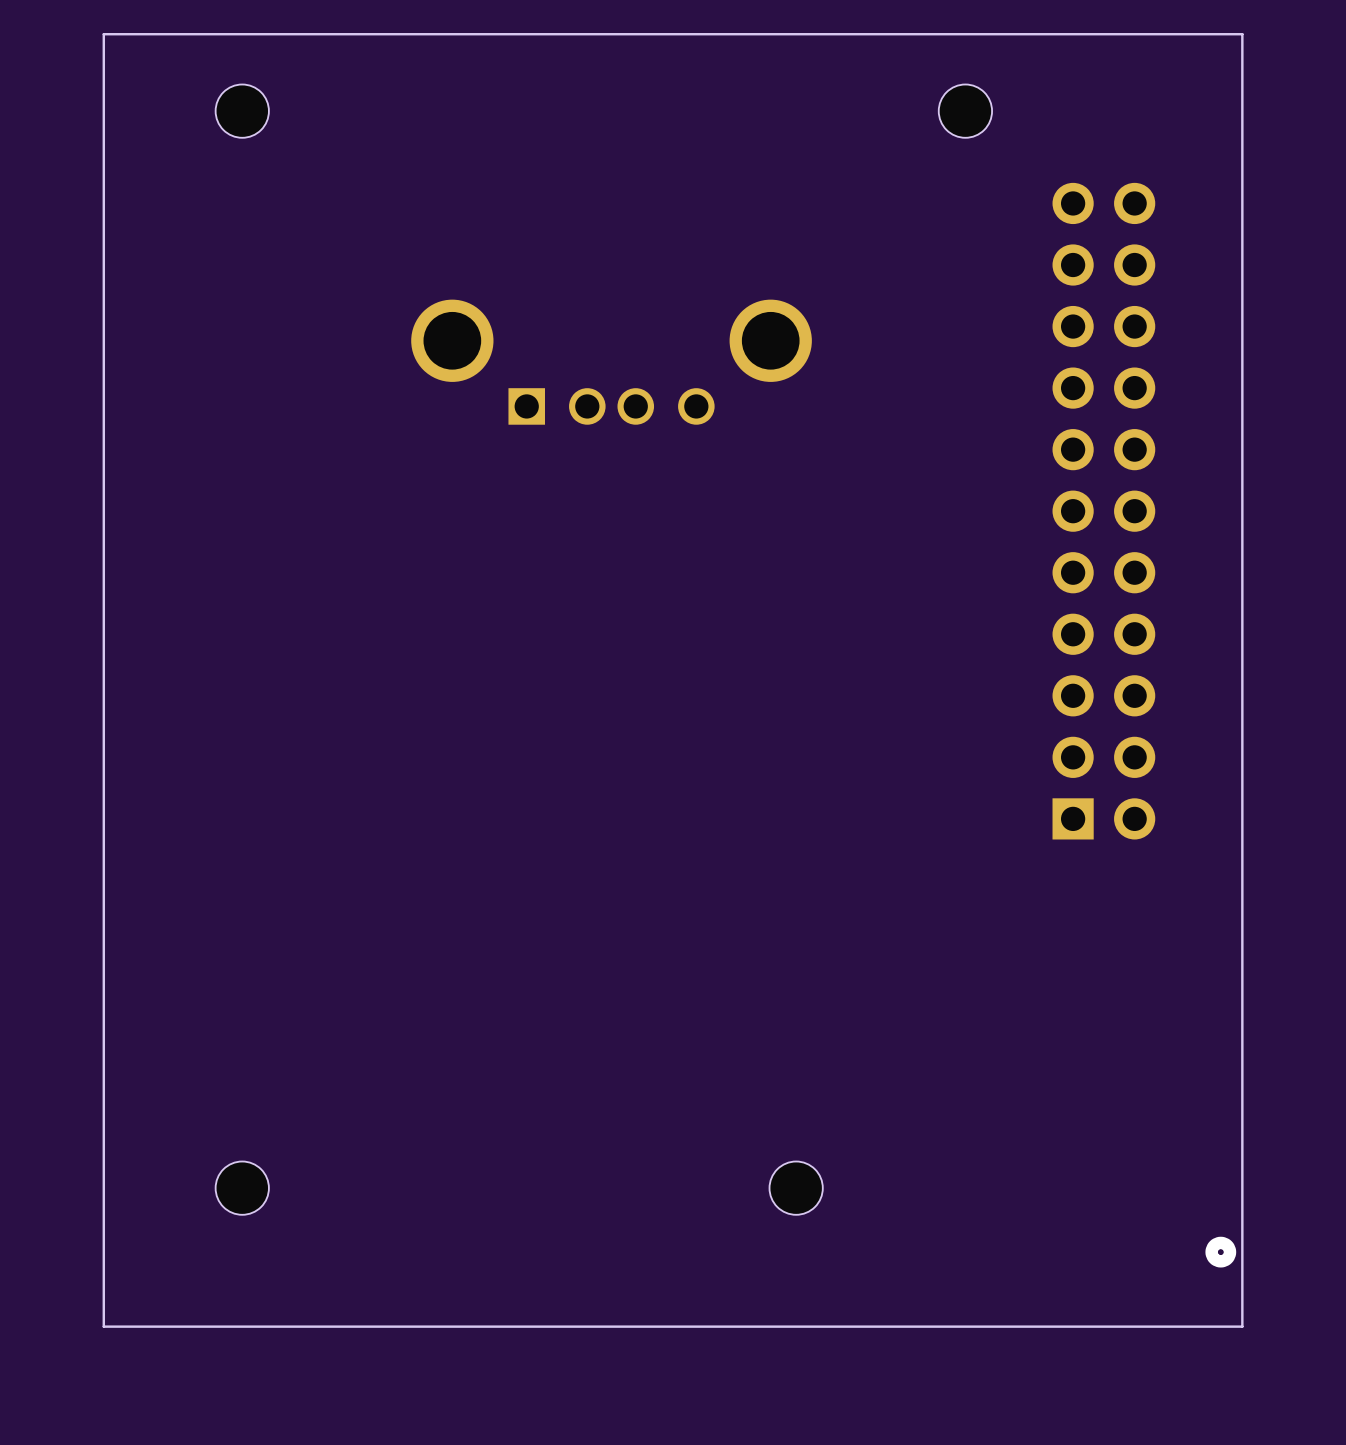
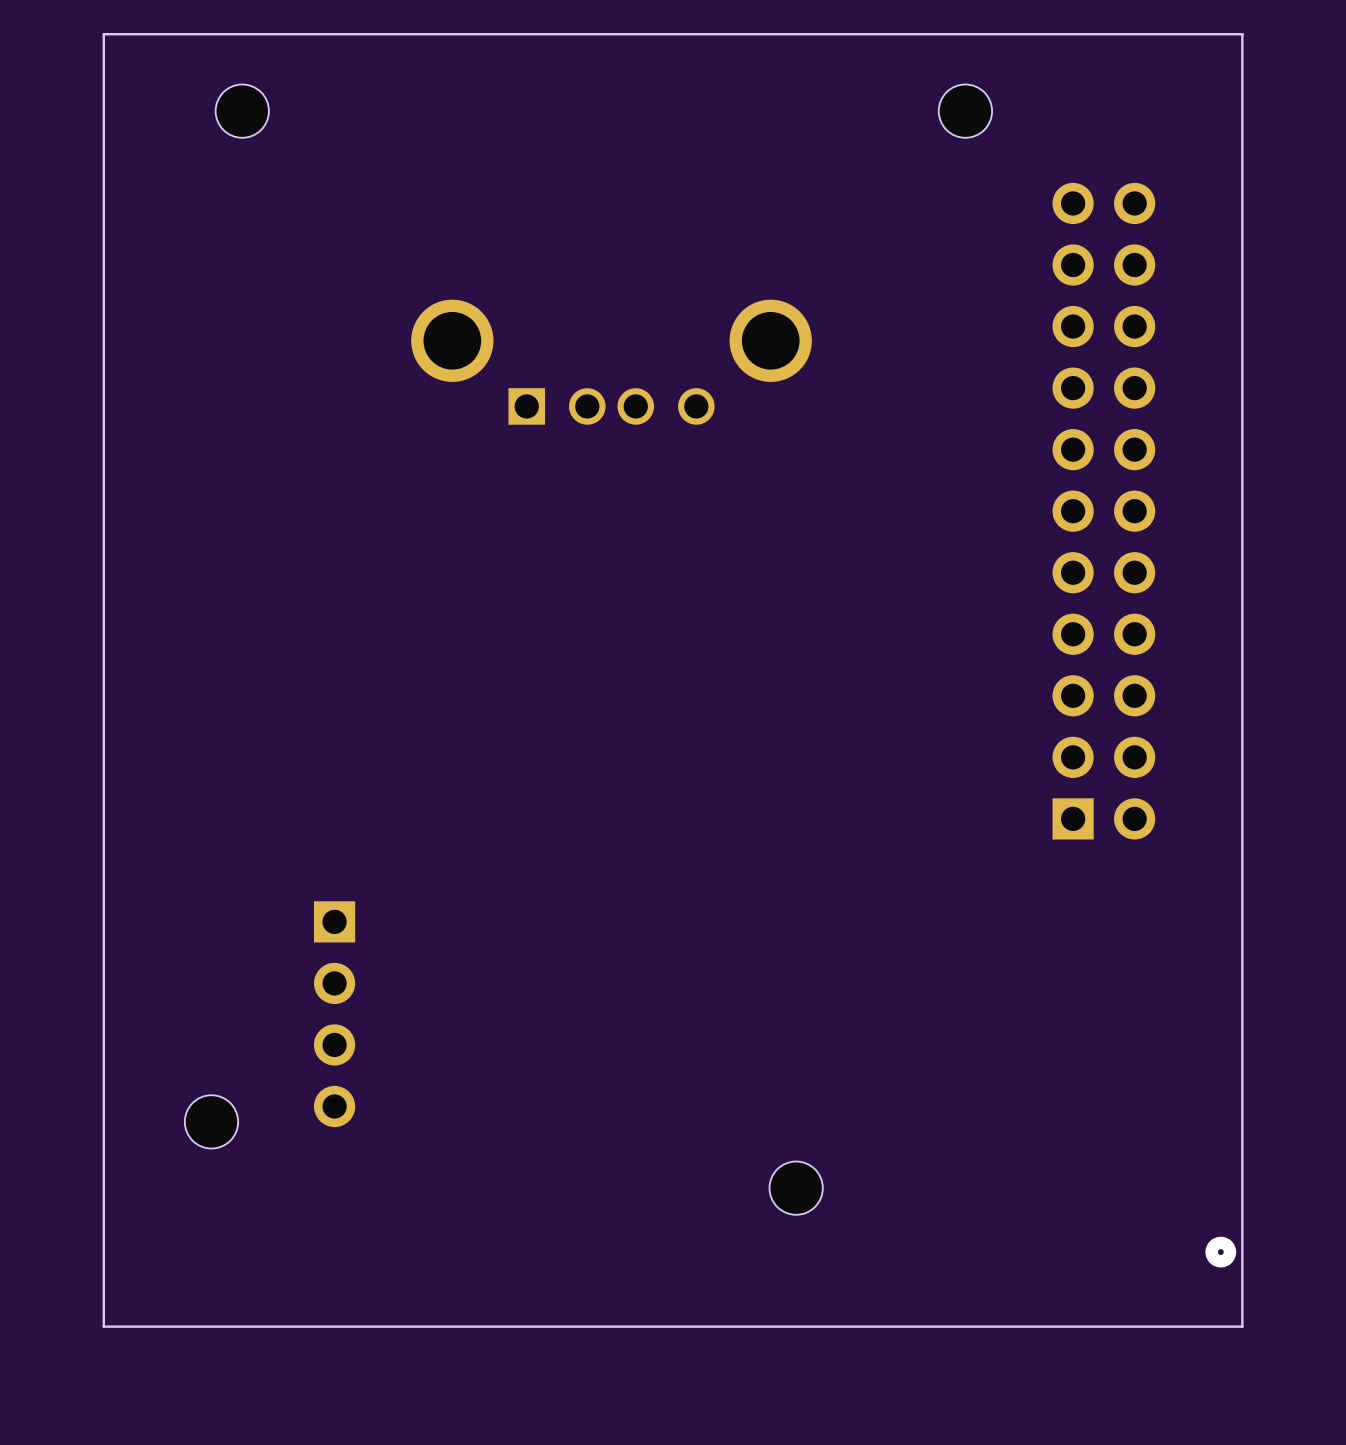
part: none -> (334, 1014)
part position: (242, 1188) -> (211, 1121)

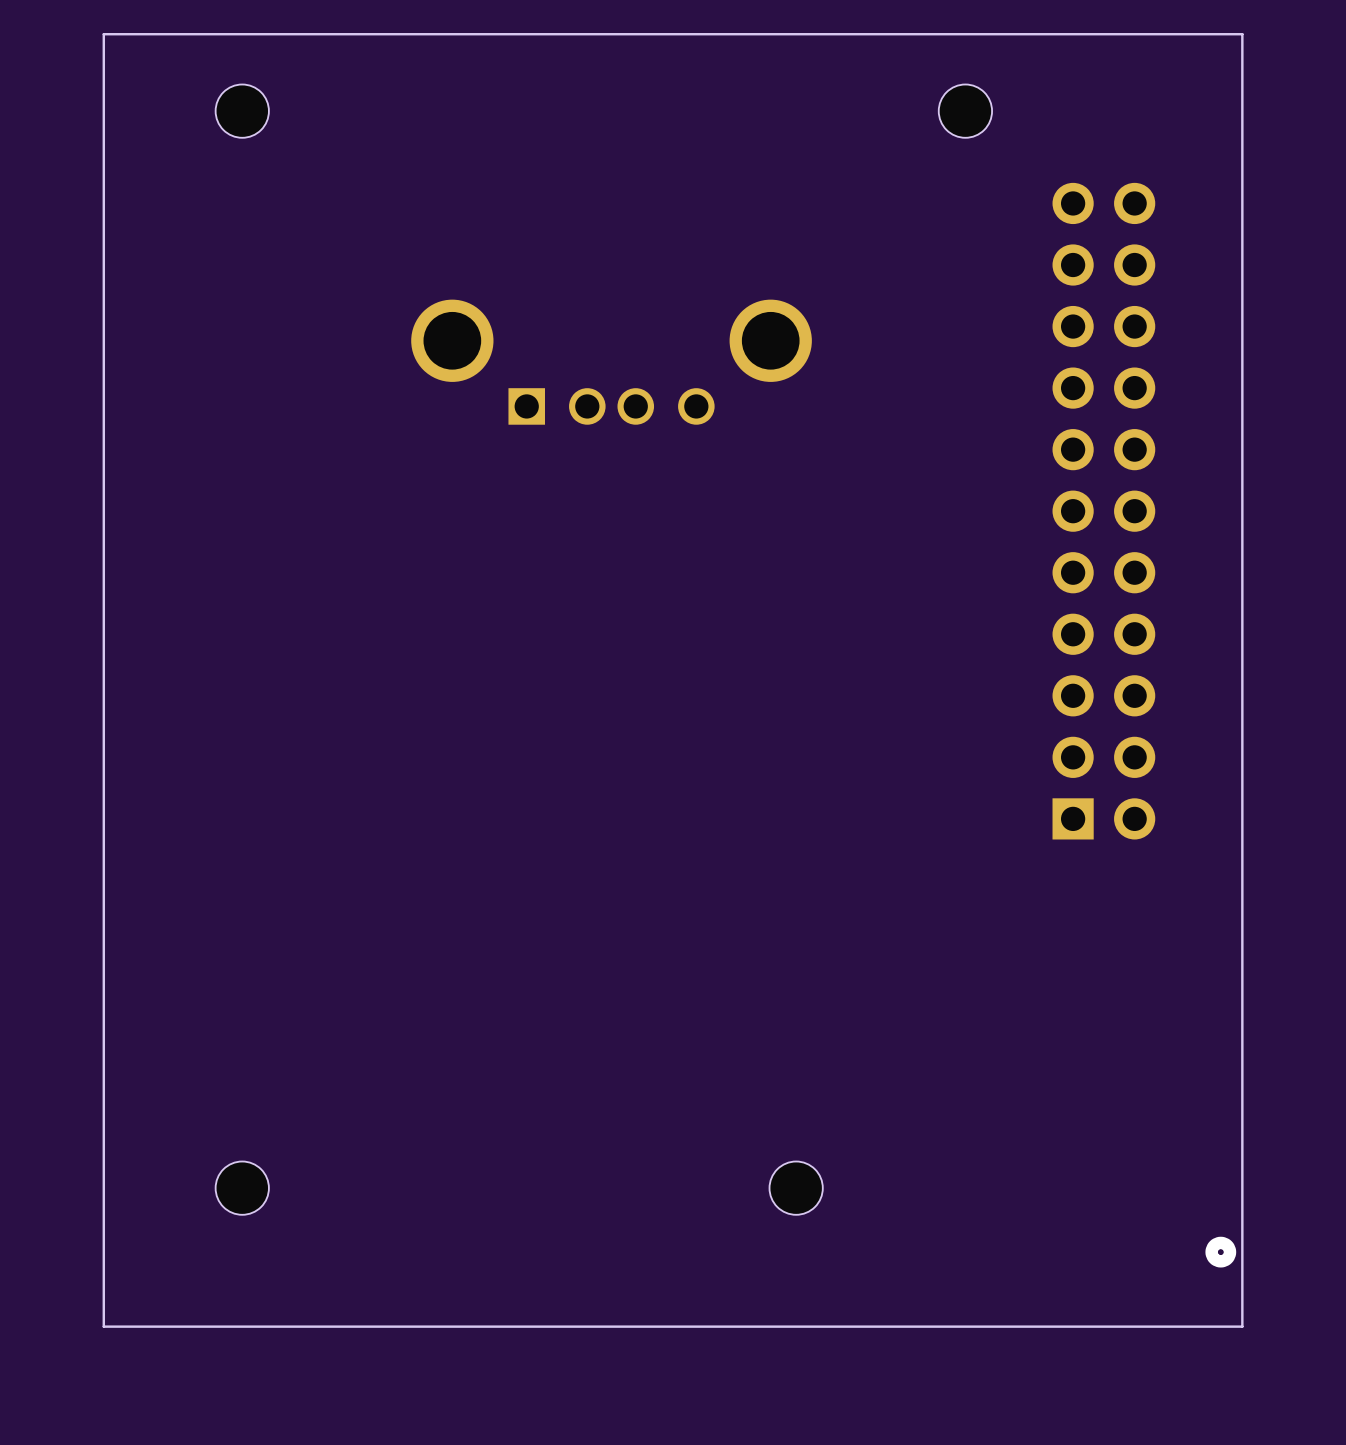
part: (334, 1014) -> none
part position: (211, 1121) -> (242, 1188)

